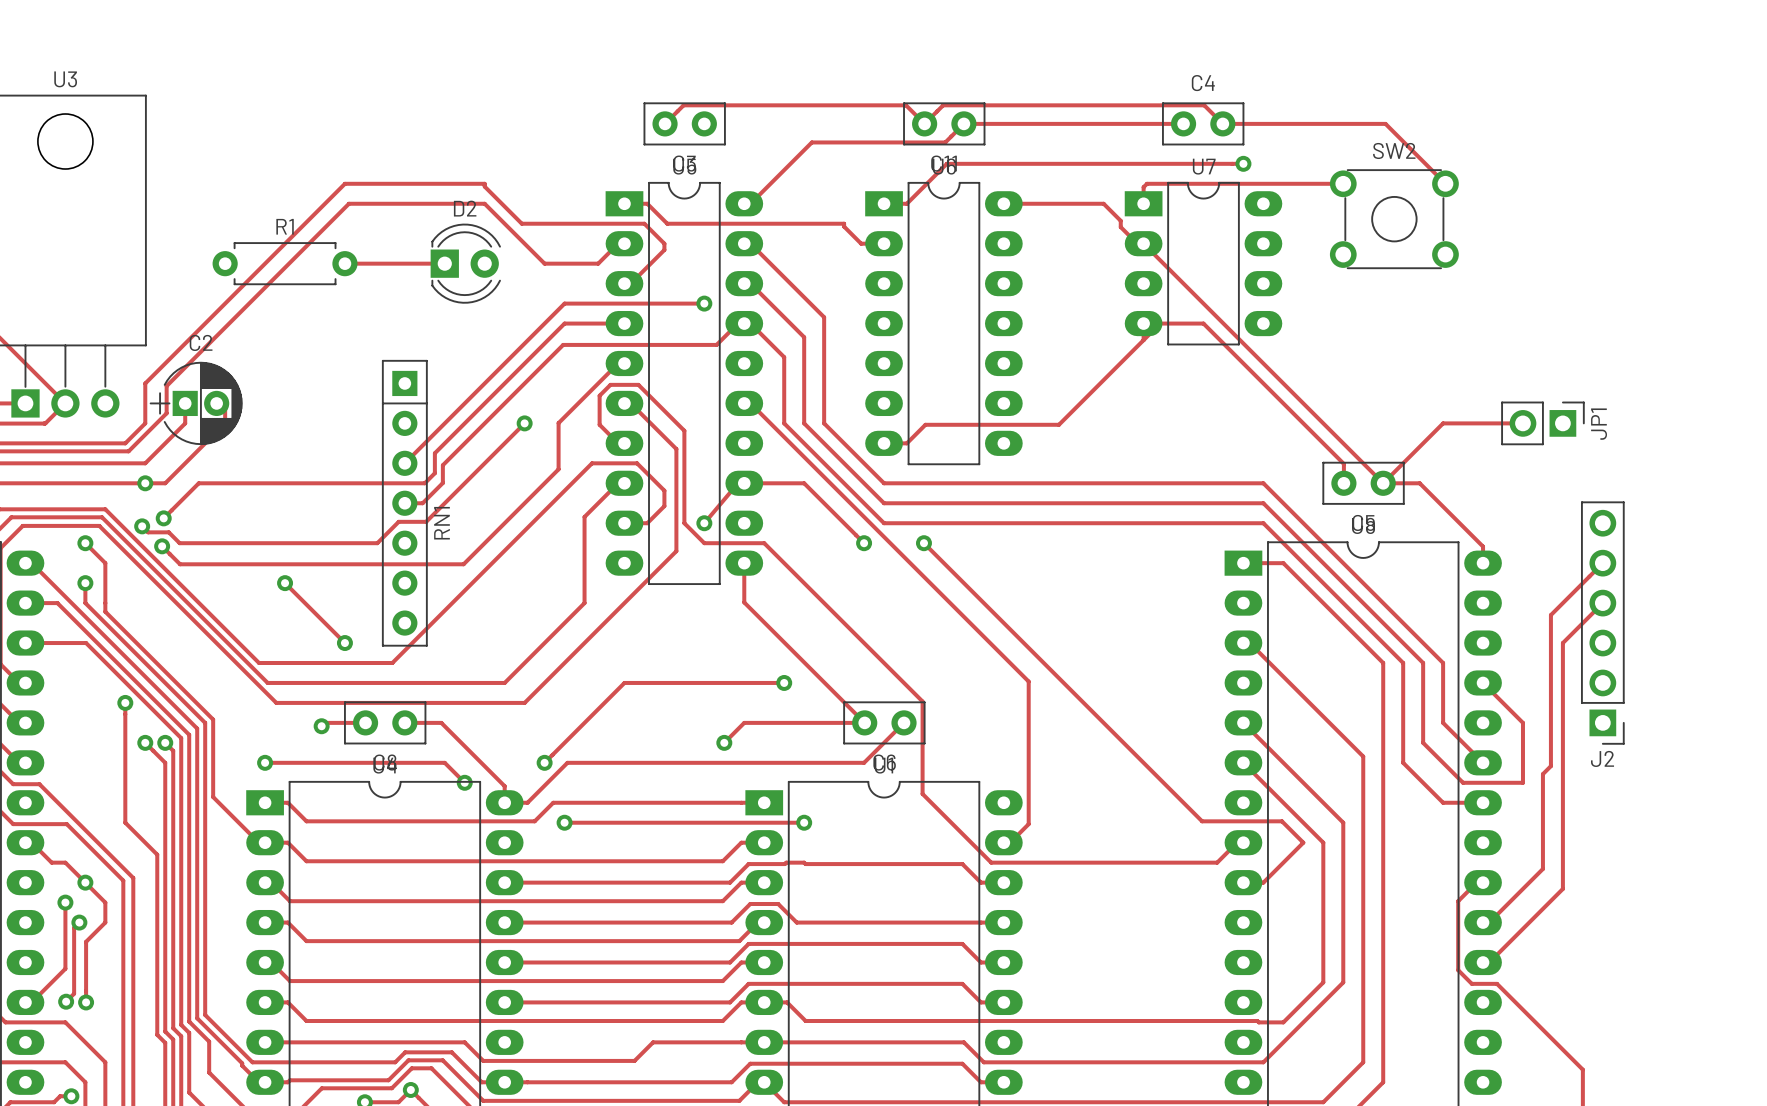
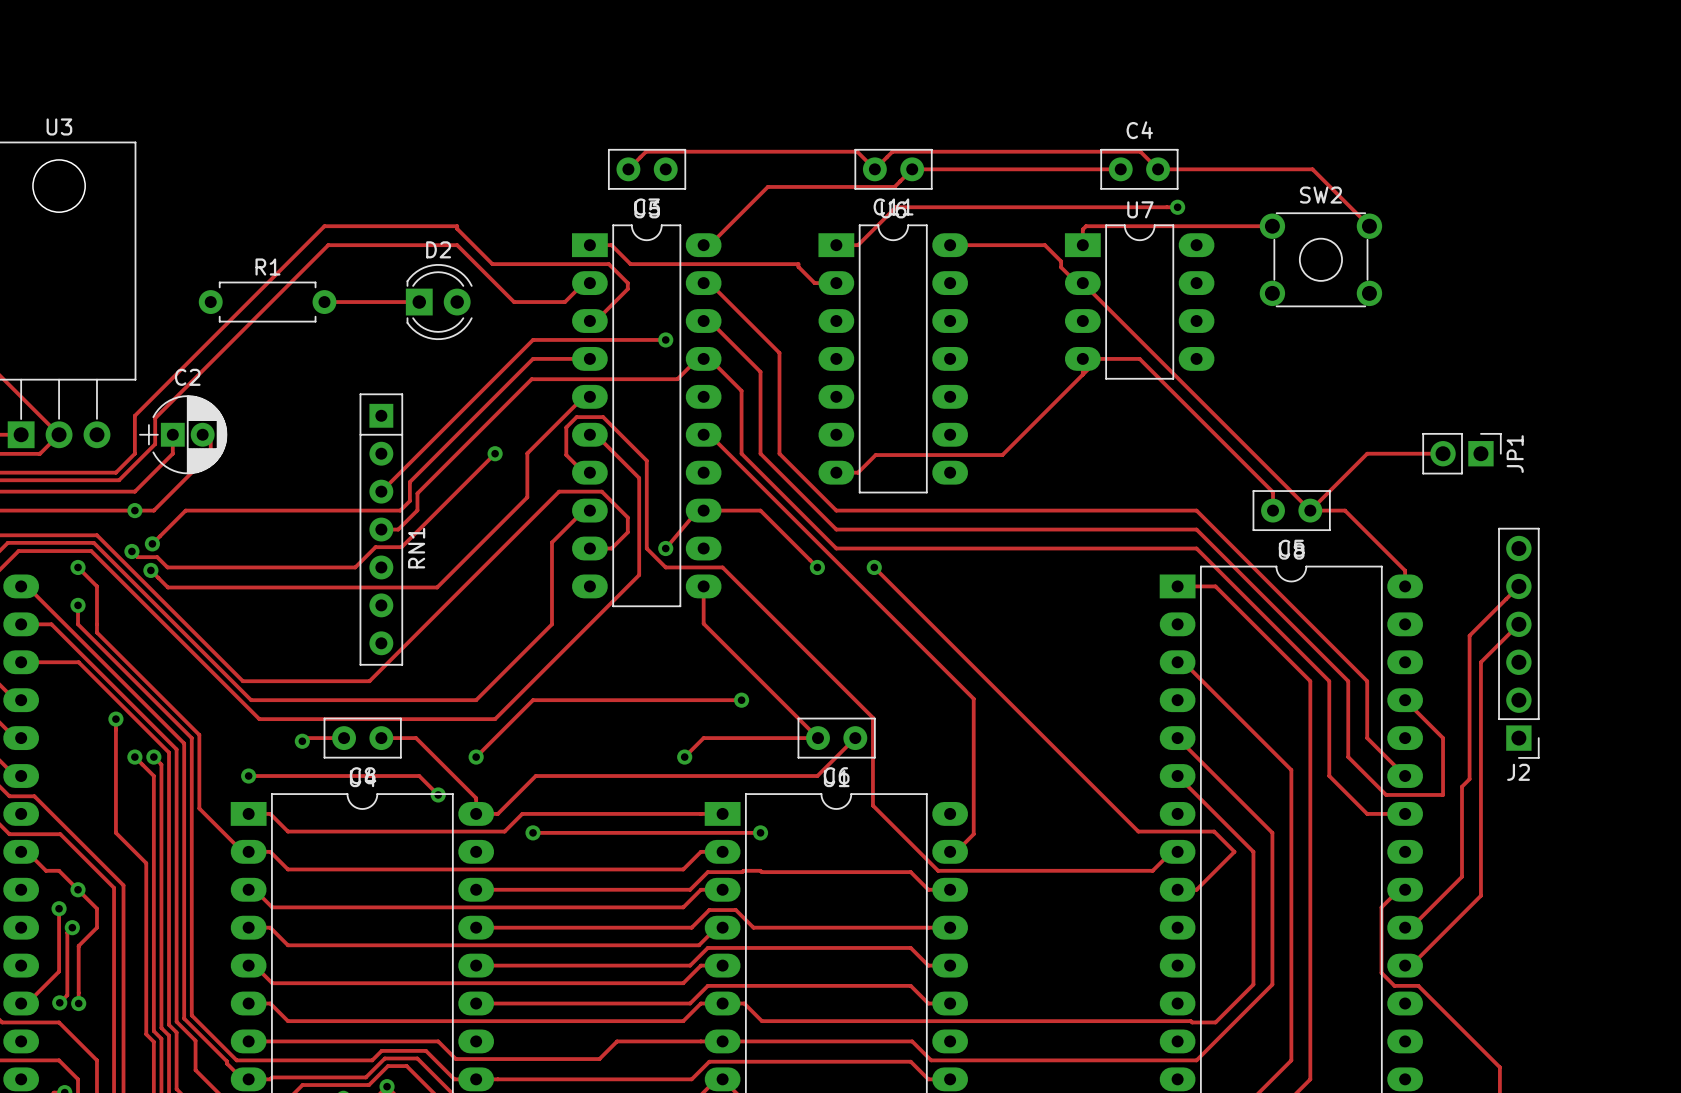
track: (285, 583) (344, 643) -> none
via: (285, 583) -> none
via: (344, 643) -> none
track: (624, 682) (544, 762) -> (589, 700) (533, 700) (476, 757)
via position: (544, 762) -> (476, 757)

